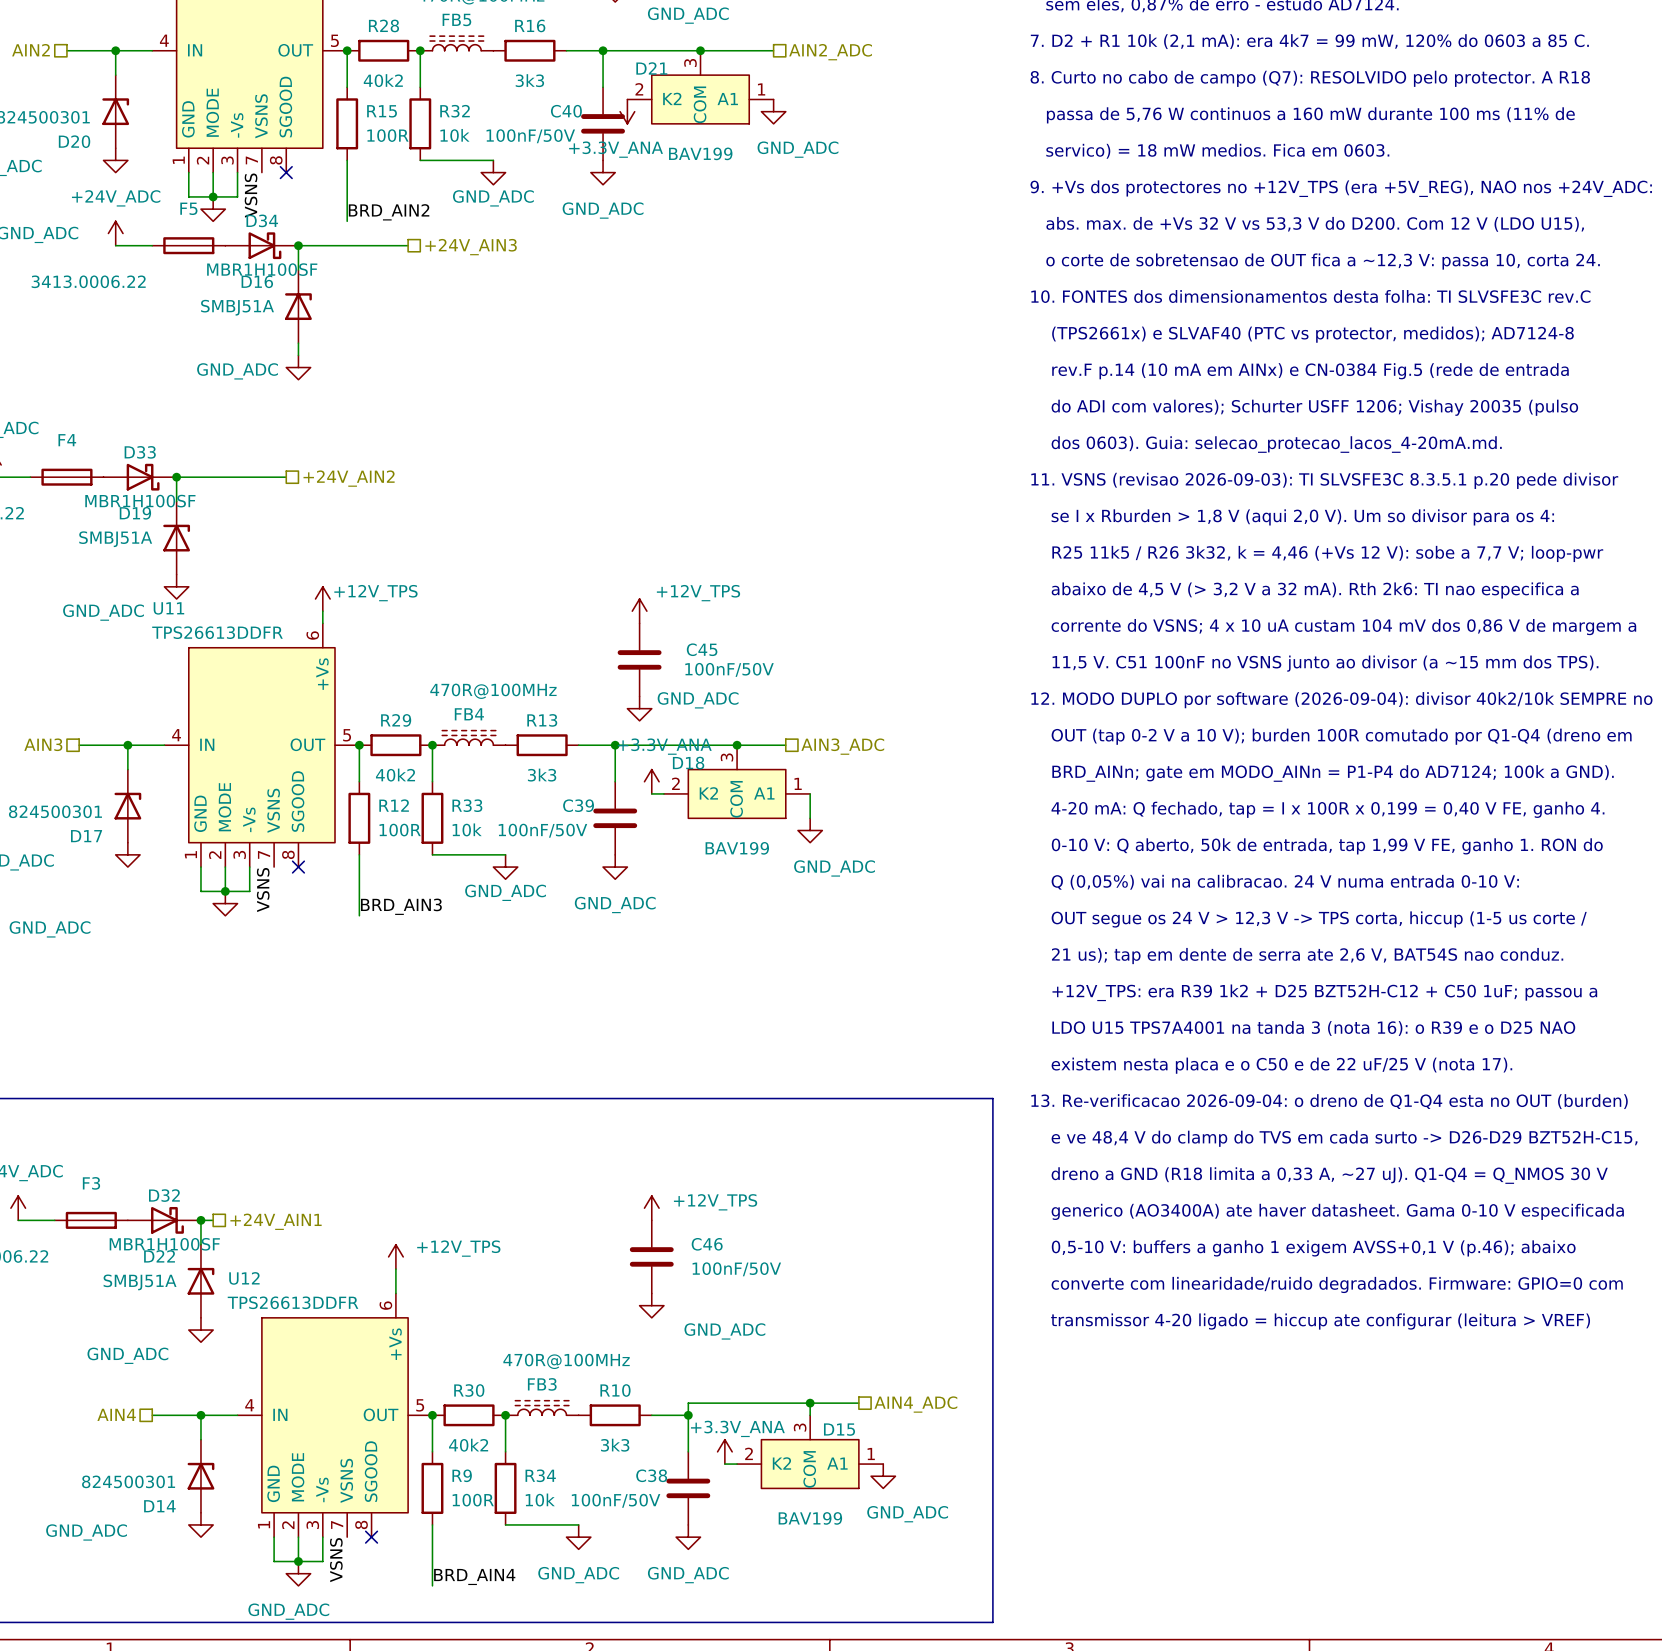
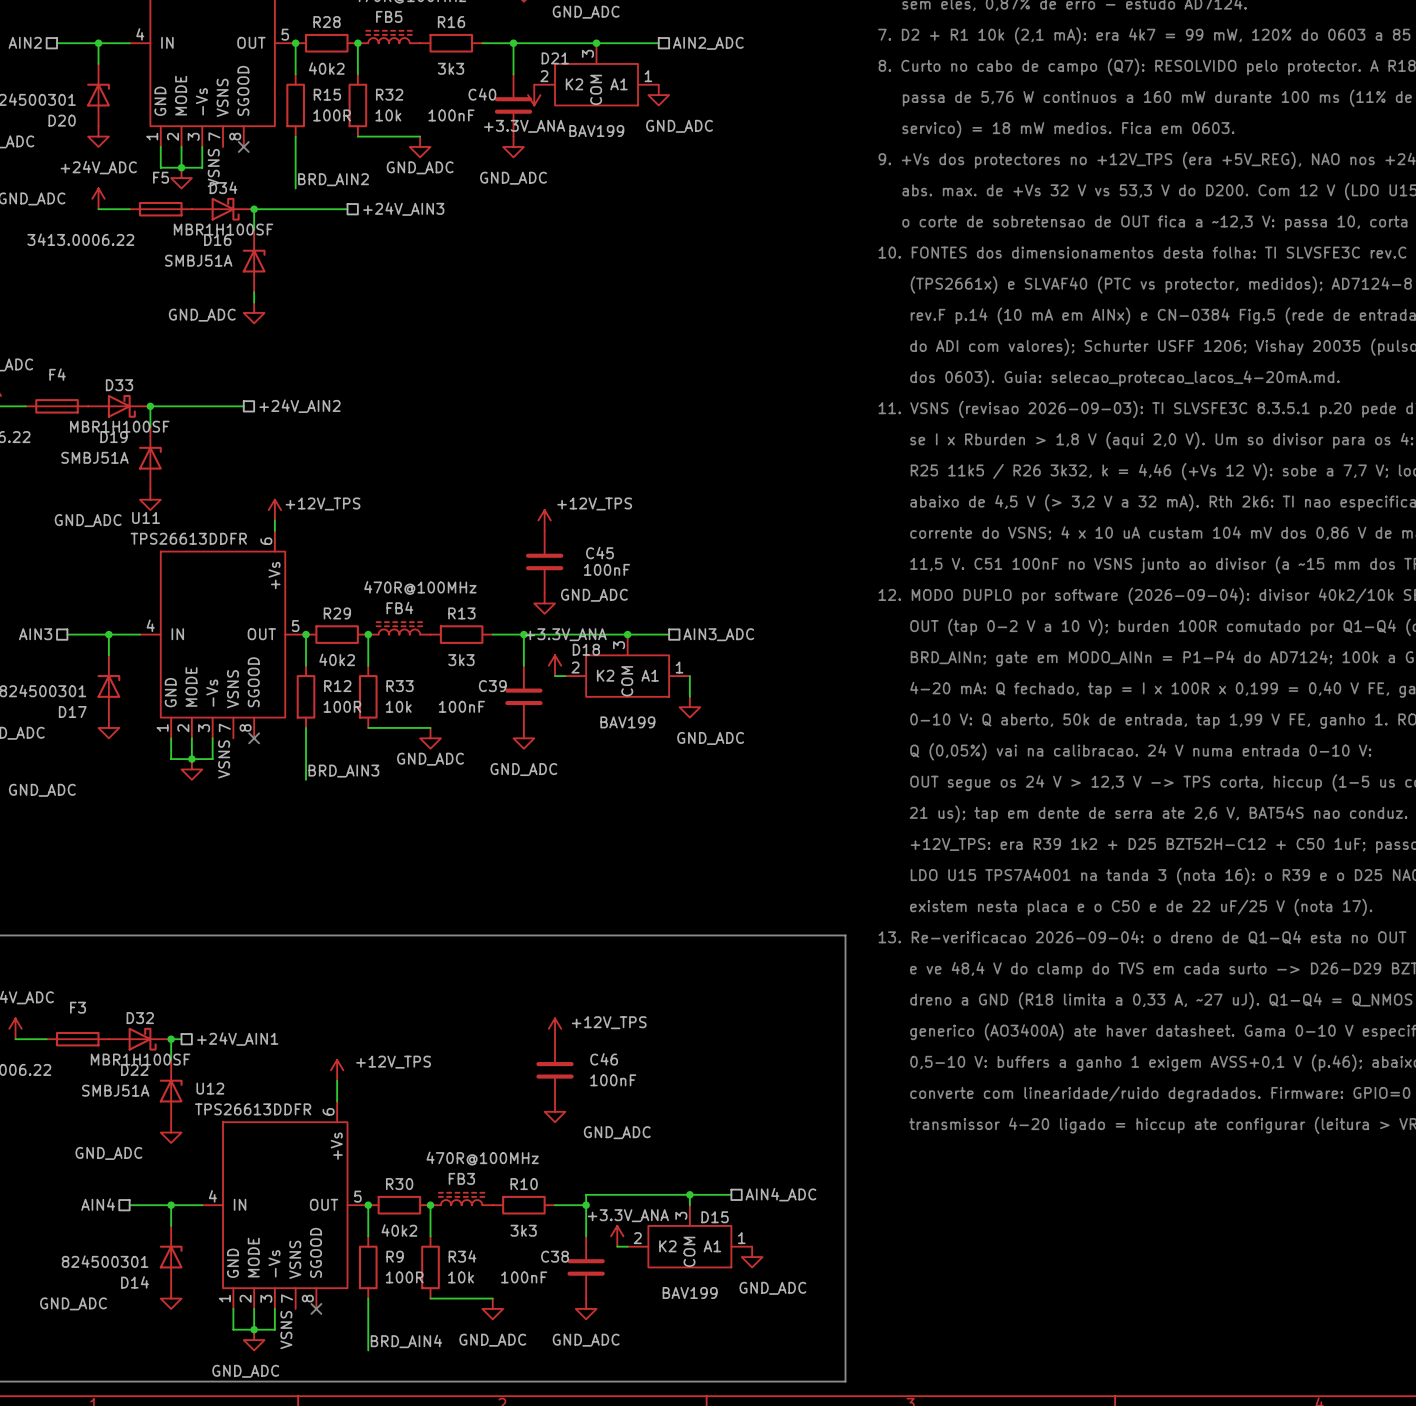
C40 value: 100nF/50V (530, 136) -> 100nF (451, 115)
C45 value: 100nF/50V (729, 669) -> 100nF (607, 569)
C39 value: 100nF/50V (542, 830) -> 100nF (461, 706)
C46 value: 100nF/50V (736, 1269) -> 100nF (613, 1080)
C38 value: 100nF/50V (616, 1500) -> 100nF (524, 1277)

